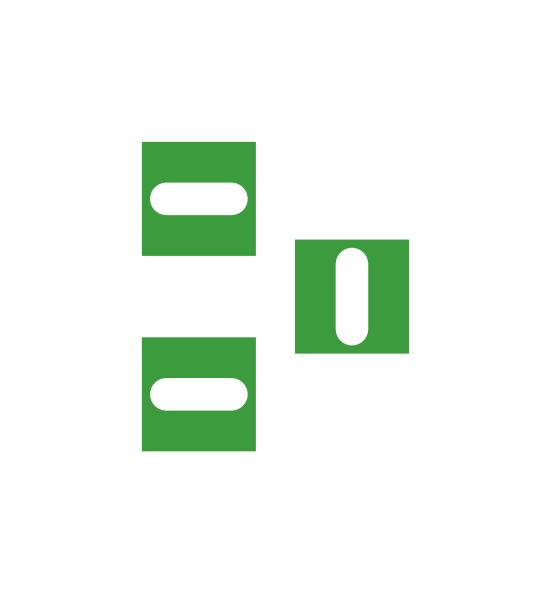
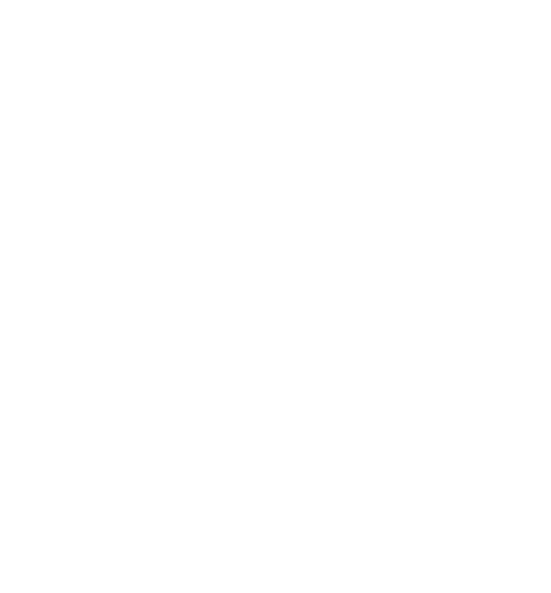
part: (275, 296) -> none

